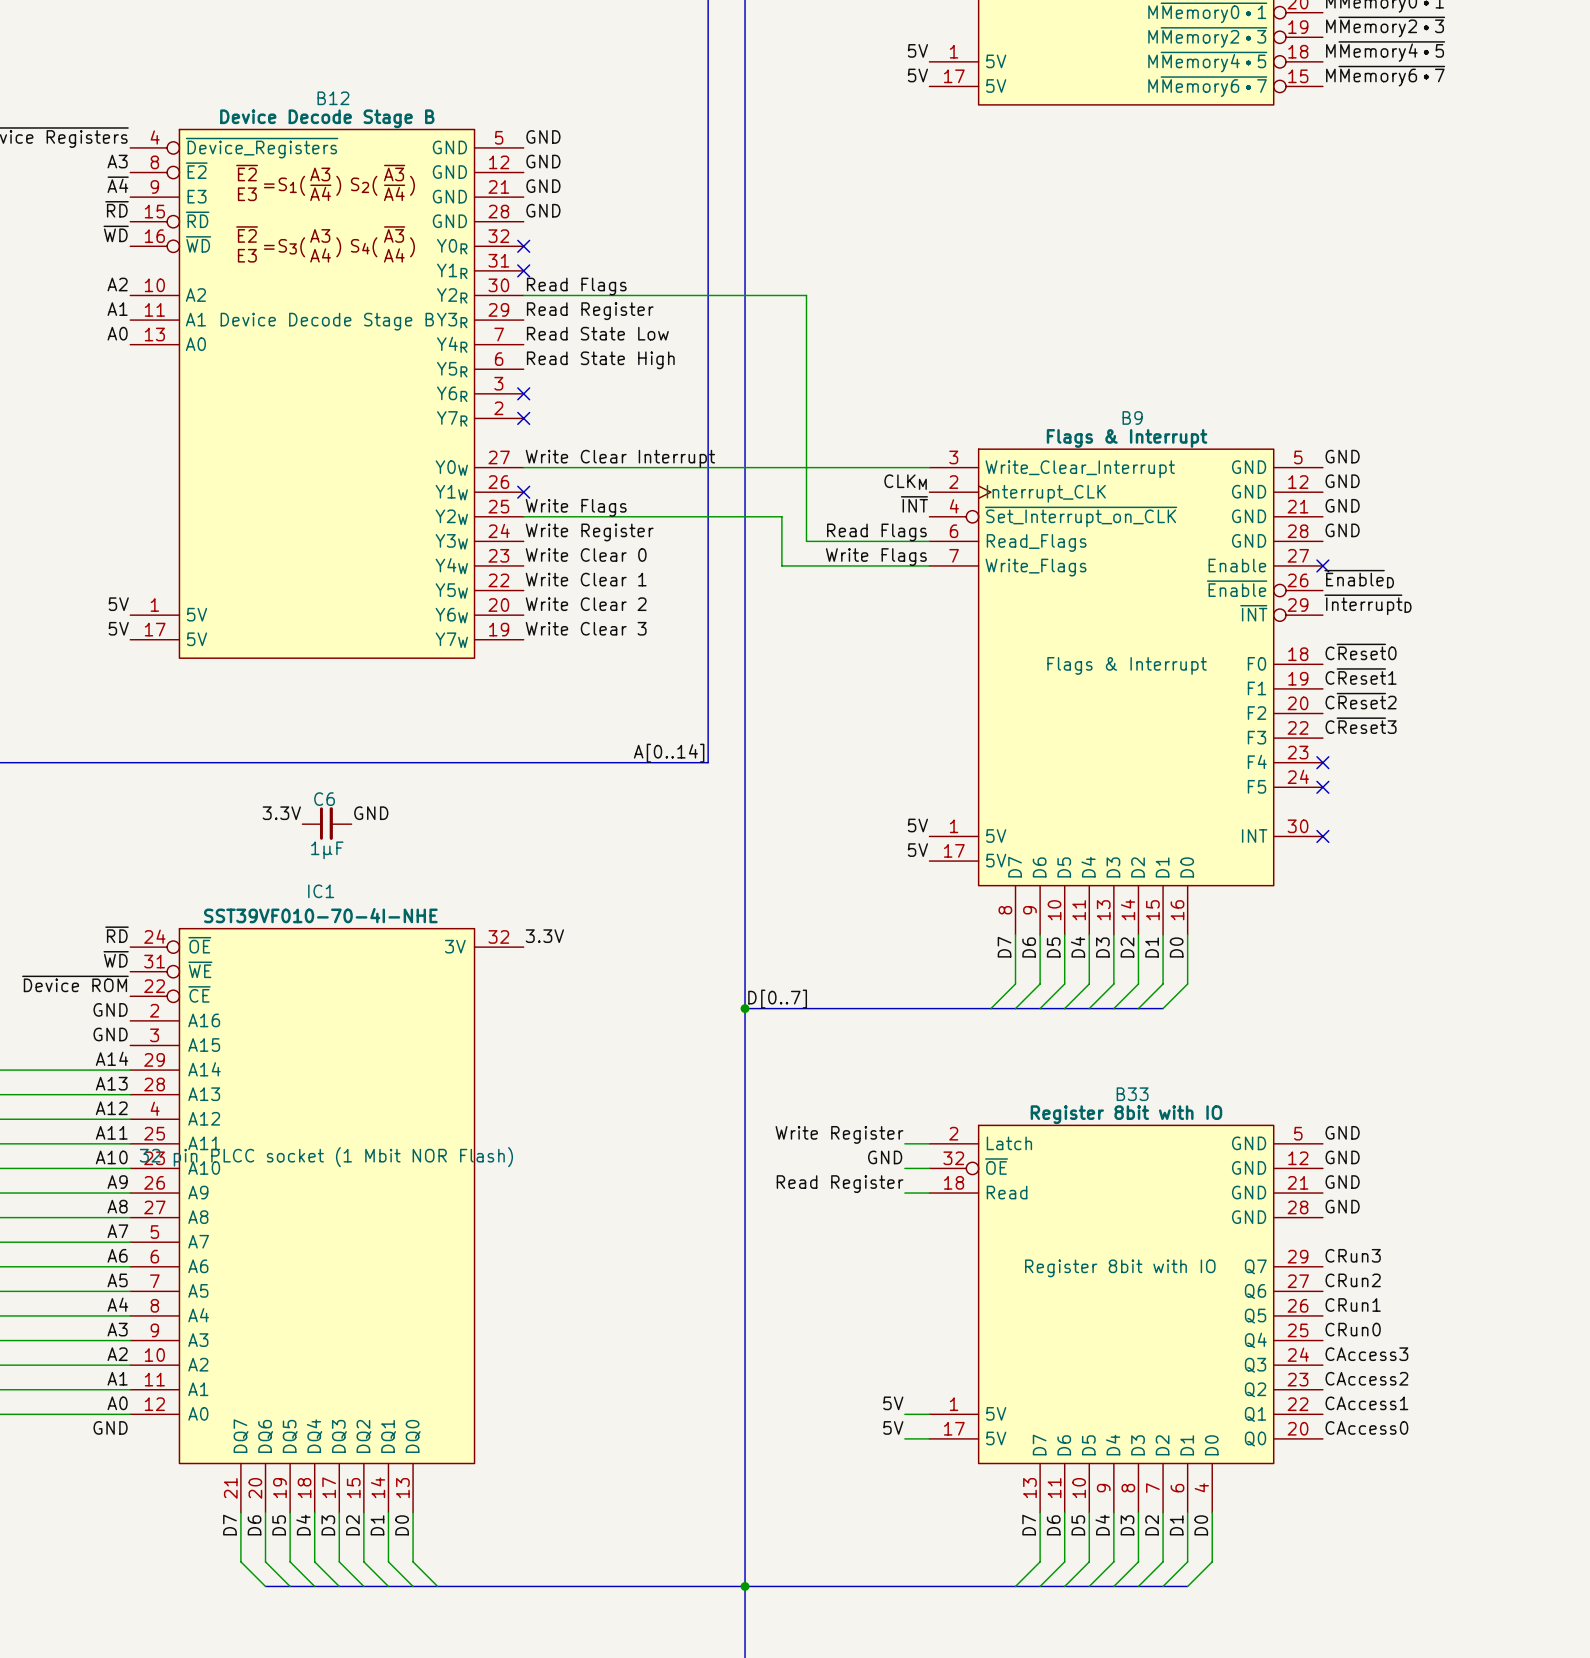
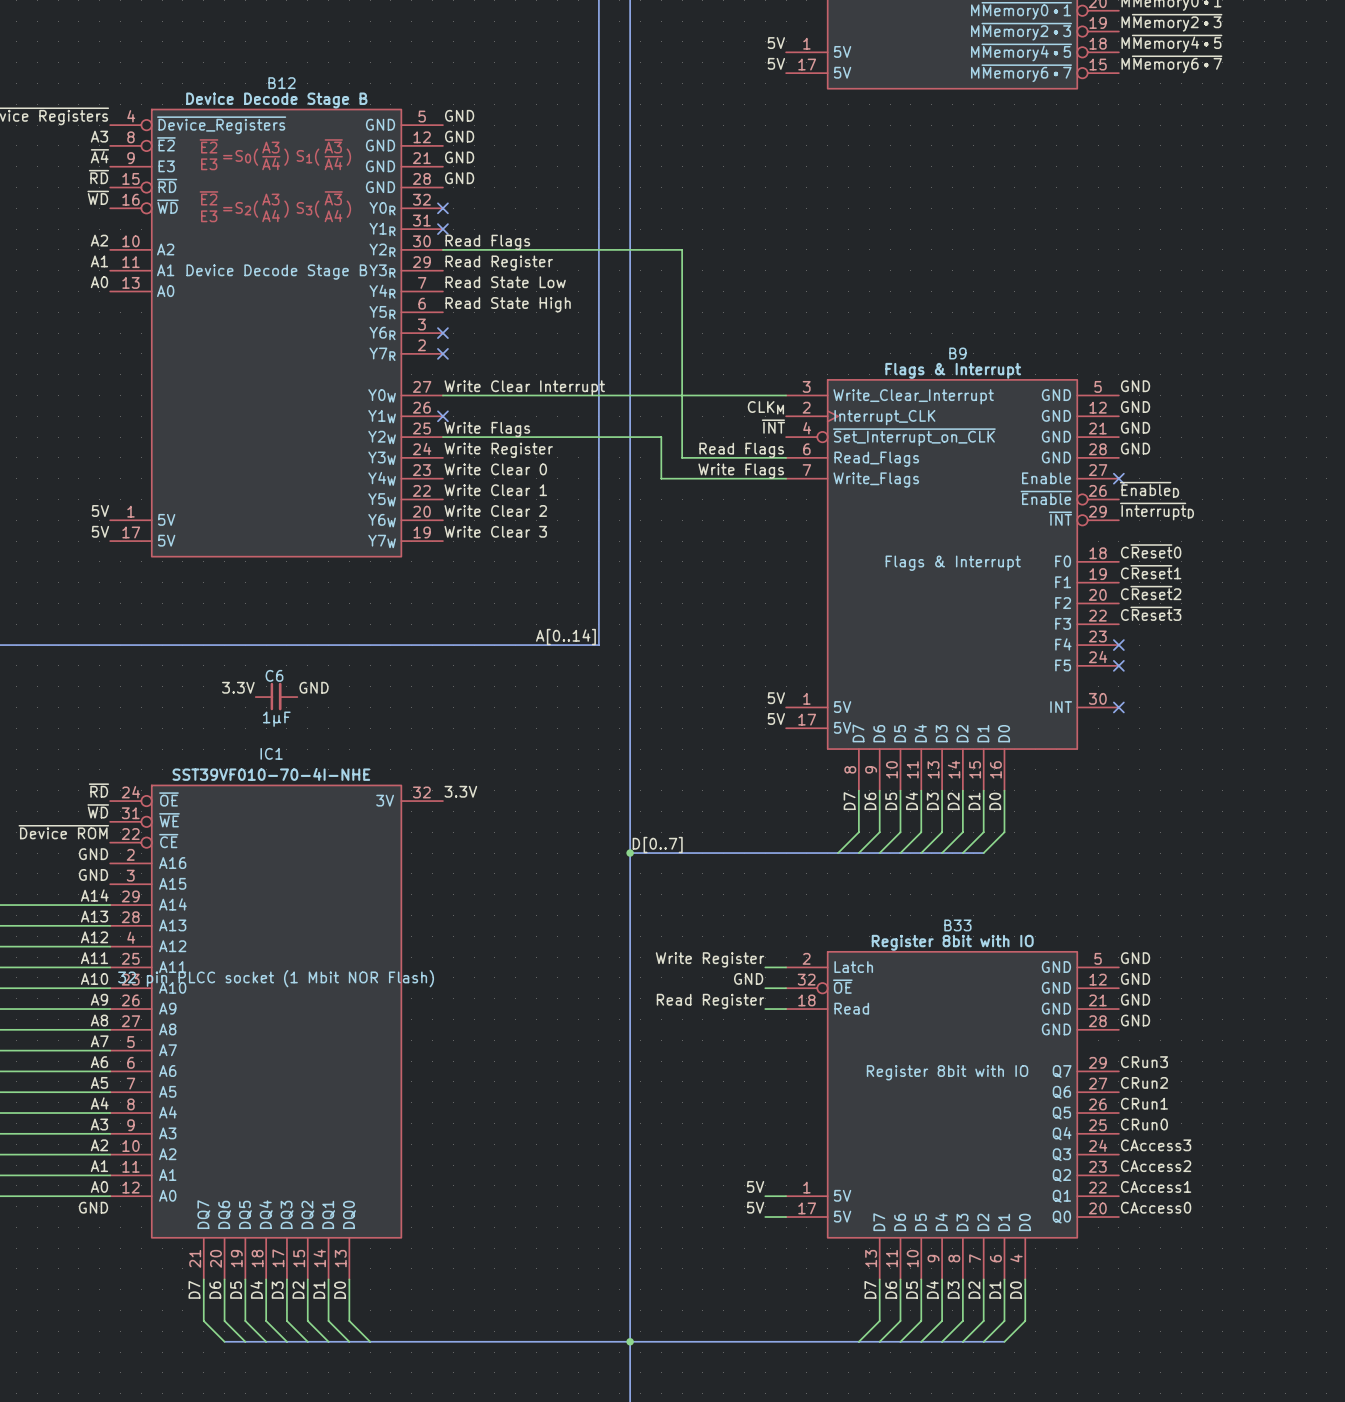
B12 text: =S1( (284, 185) -> =S0( (240, 157)
B12 text: S2( (364, 185) -> S1( (308, 157)
B12 text: =S3( (284, 247) -> =S2( (240, 209)
B12 text: S4( (364, 247) -> S3( (308, 209)

